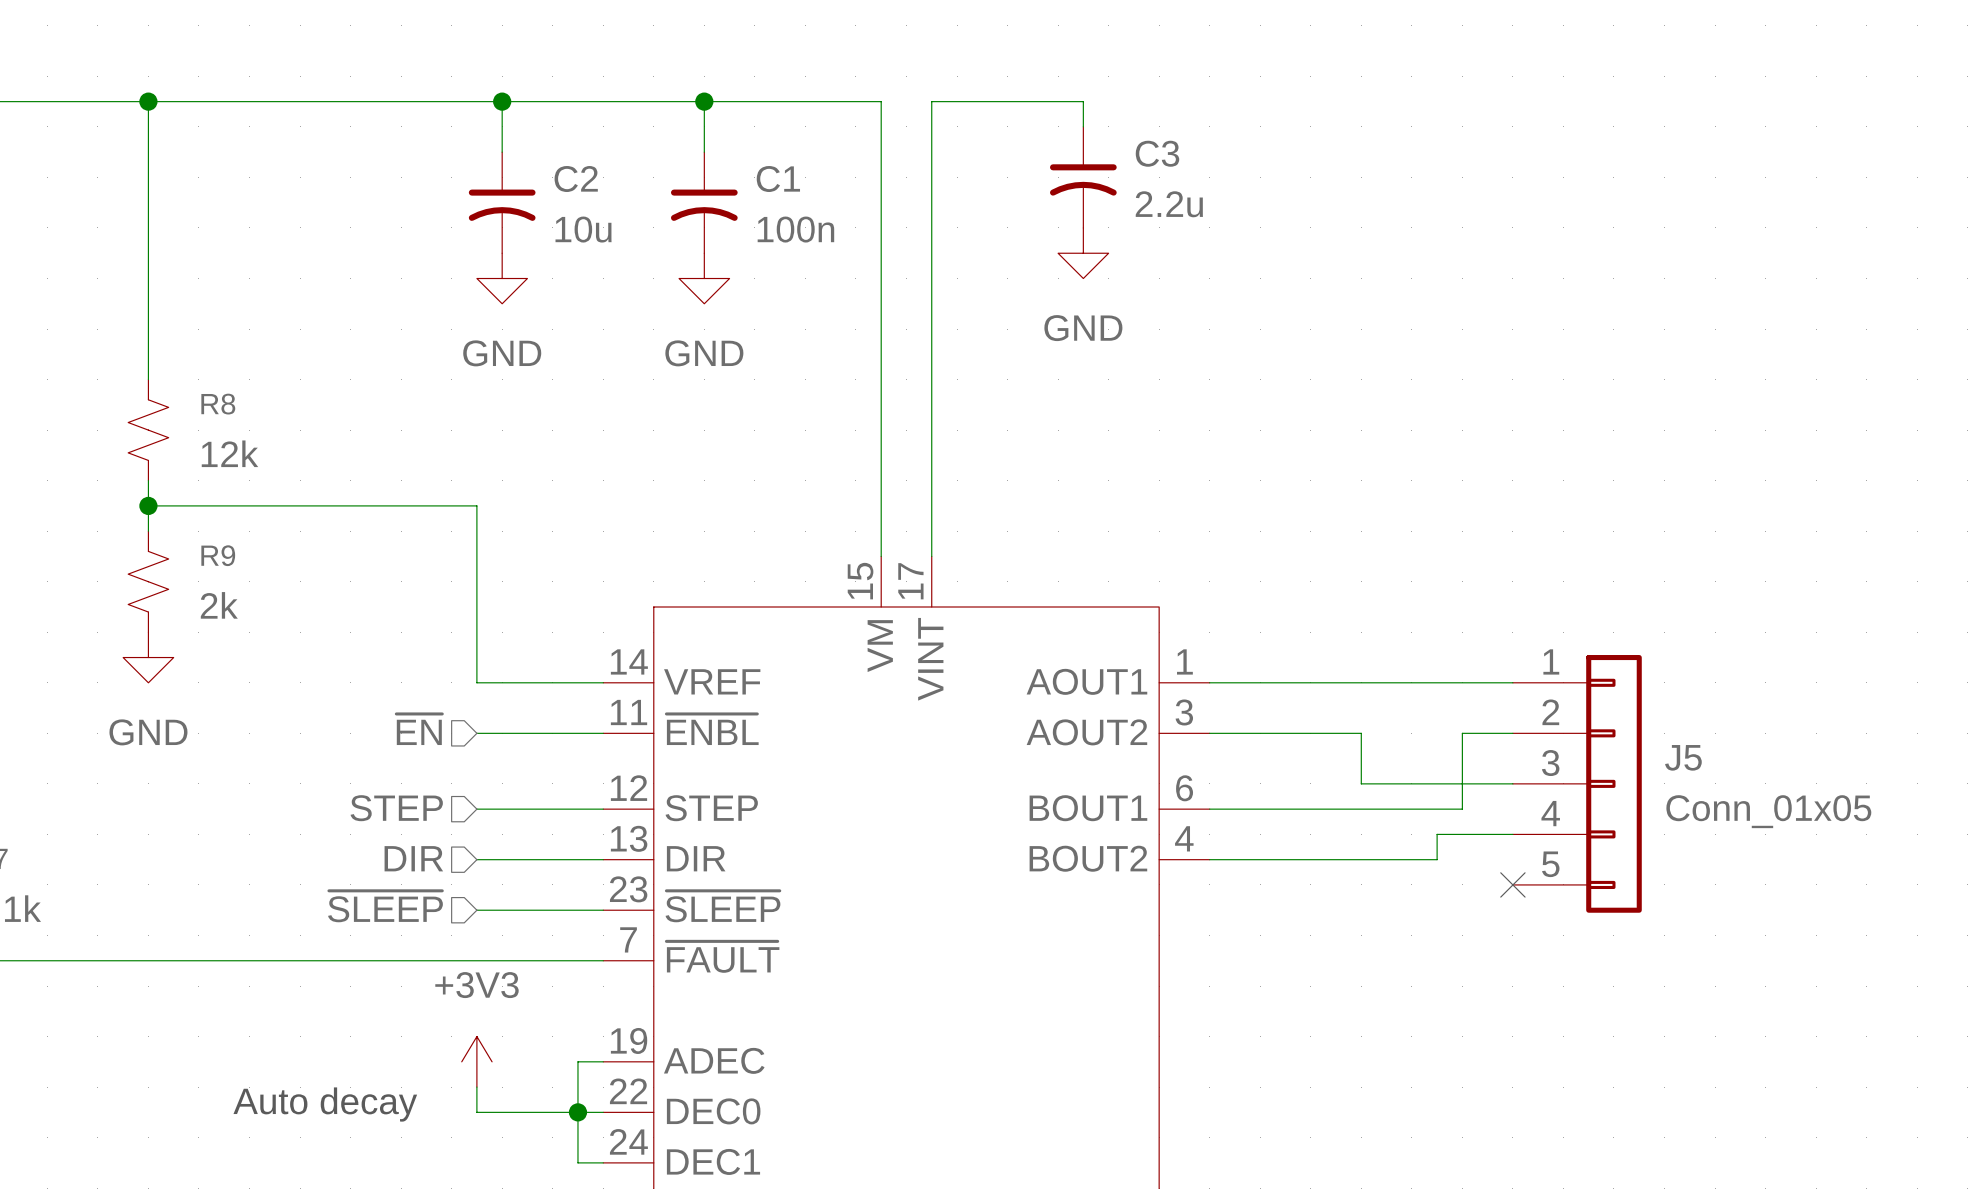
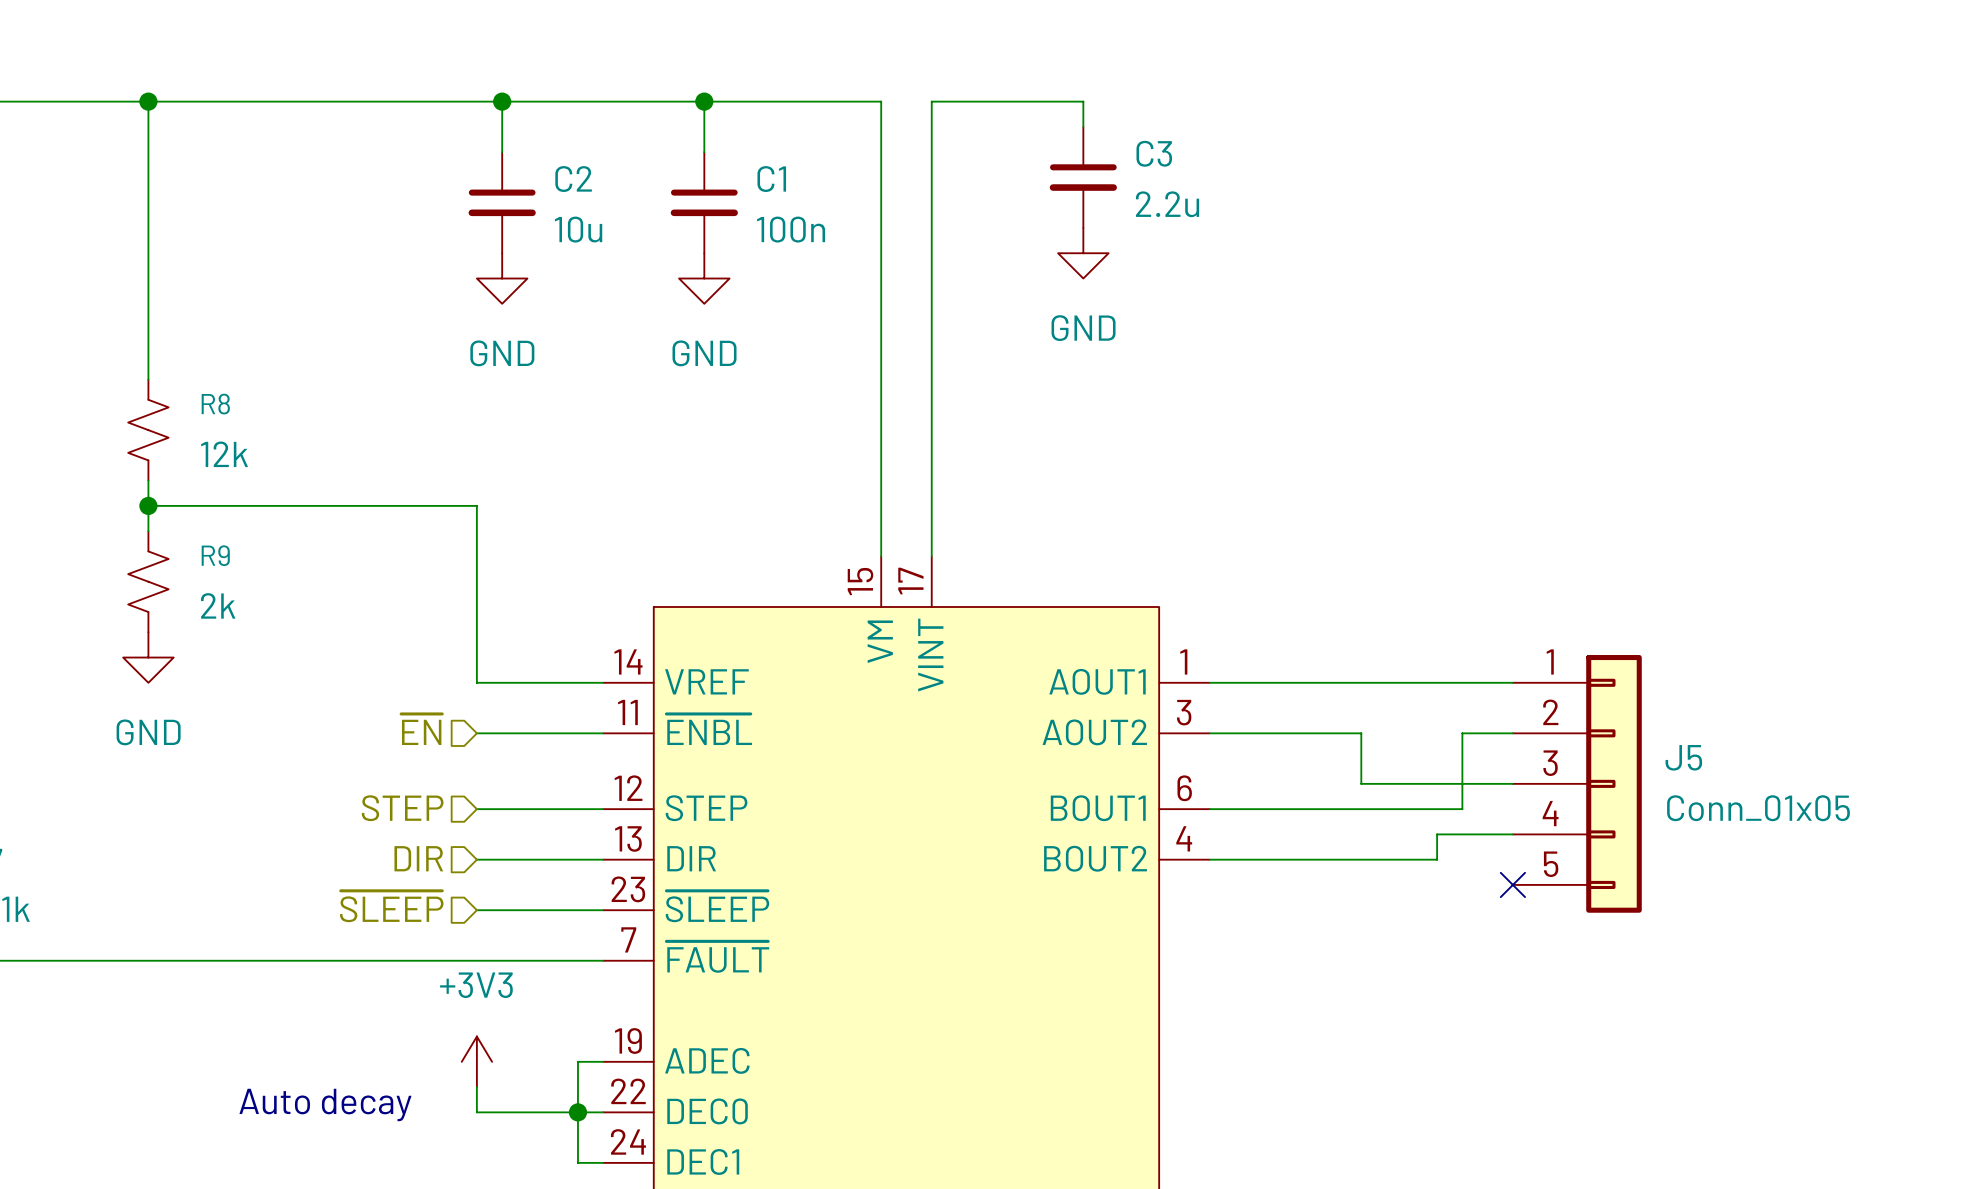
C3 symbol: [1049, 126, 1117, 228] -> [1049, 126, 1117, 228]
C2 symbol: [468, 152, 536, 254] -> [468, 152, 536, 254]
C1 symbol: [670, 152, 738, 254] -> [670, 152, 738, 254]

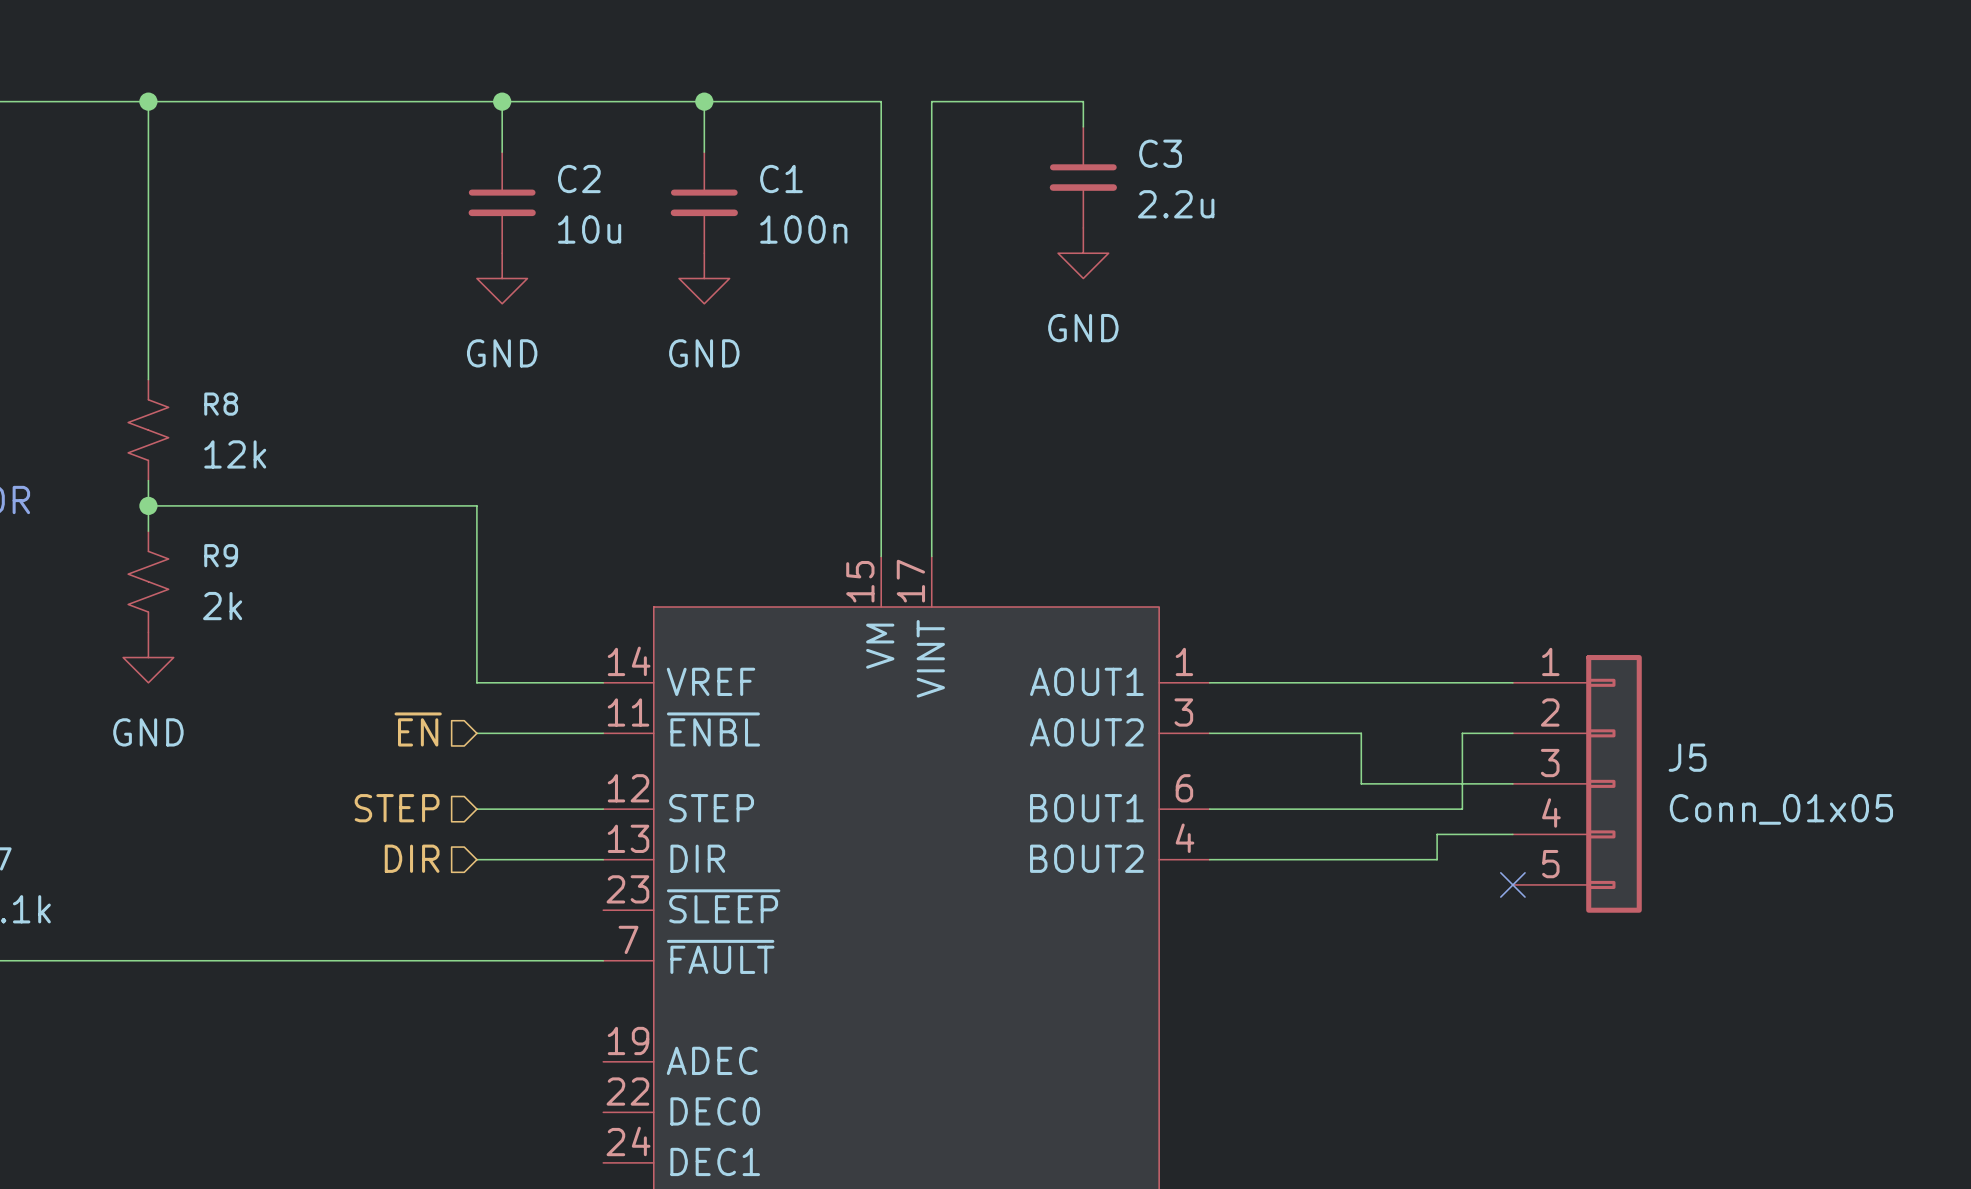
hierarchical label: ~{SLEEP} (391, 906) -> none
wire: (476, 910) (603, 910) -> none
power symbol: +3V3 (476, 1061) -> none
wire: (603, 1061) (577, 1061) (577, 1162) (603, 1162) -> none
wire: (476, 1087) (476, 1112) (603, 1112) -> none
text: Auto decay (325, 1105) -> none
junction: (577, 1112) -> none

